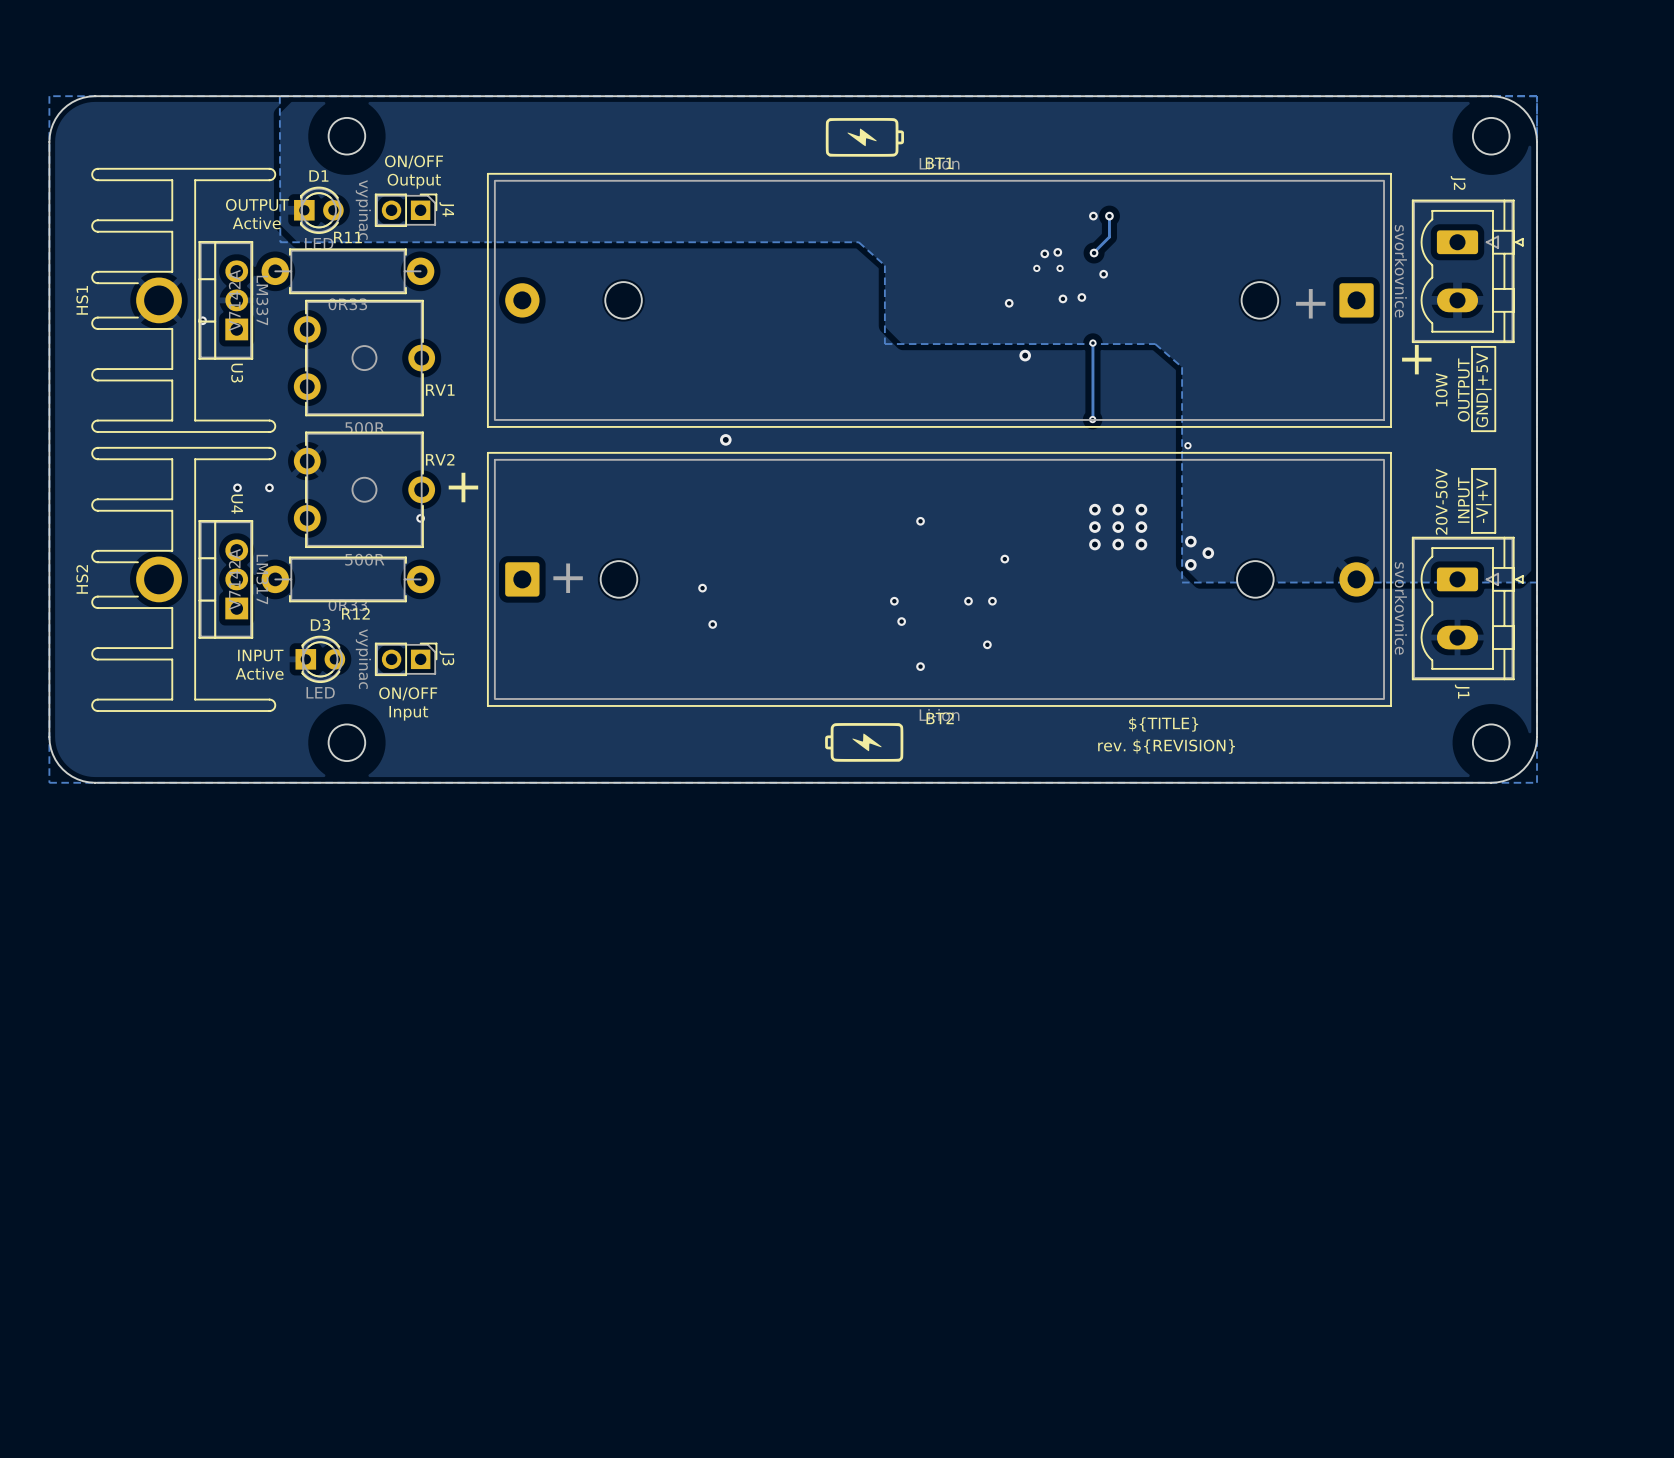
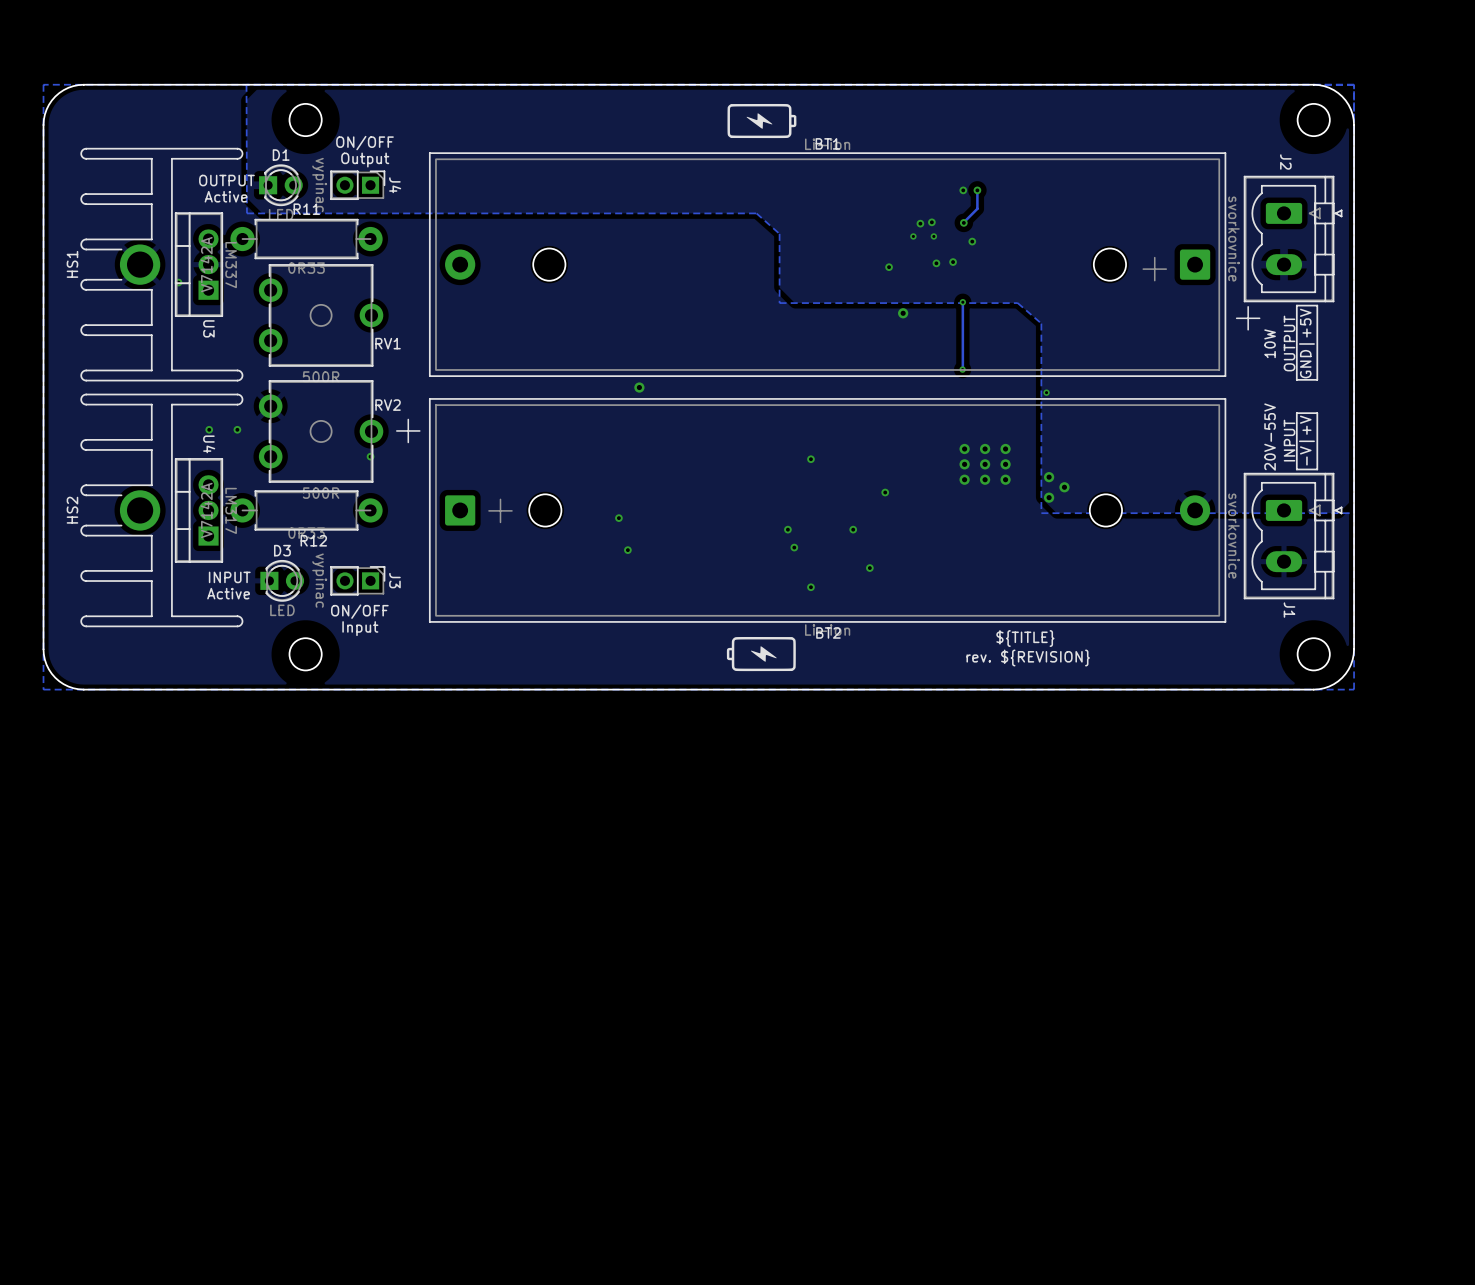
text: 20V-50V (1441, 501) -> 20V-55V (1270, 437)
via: (992, 601) -> none

